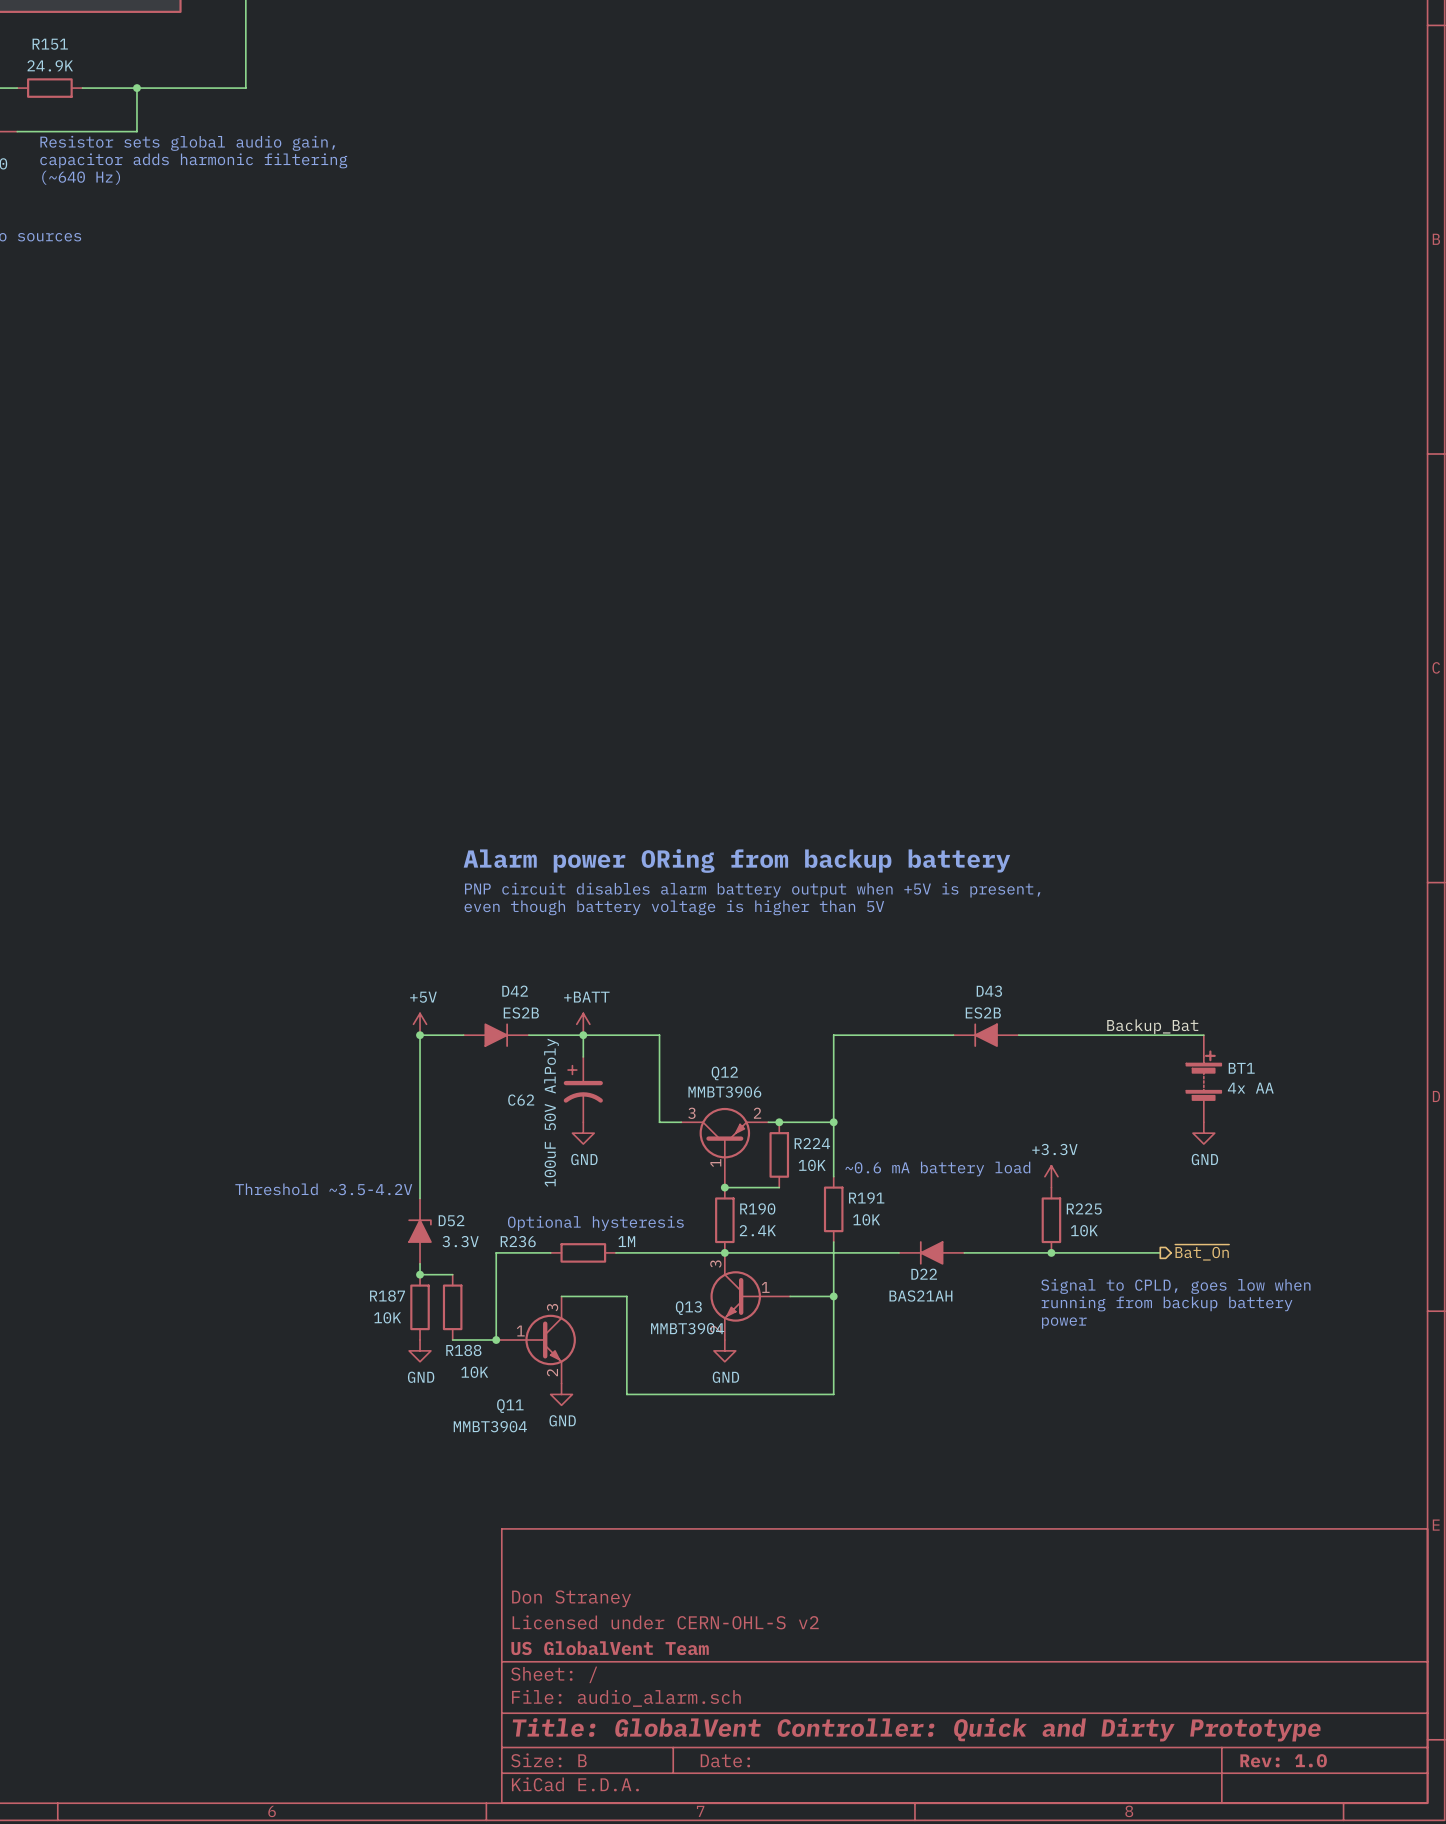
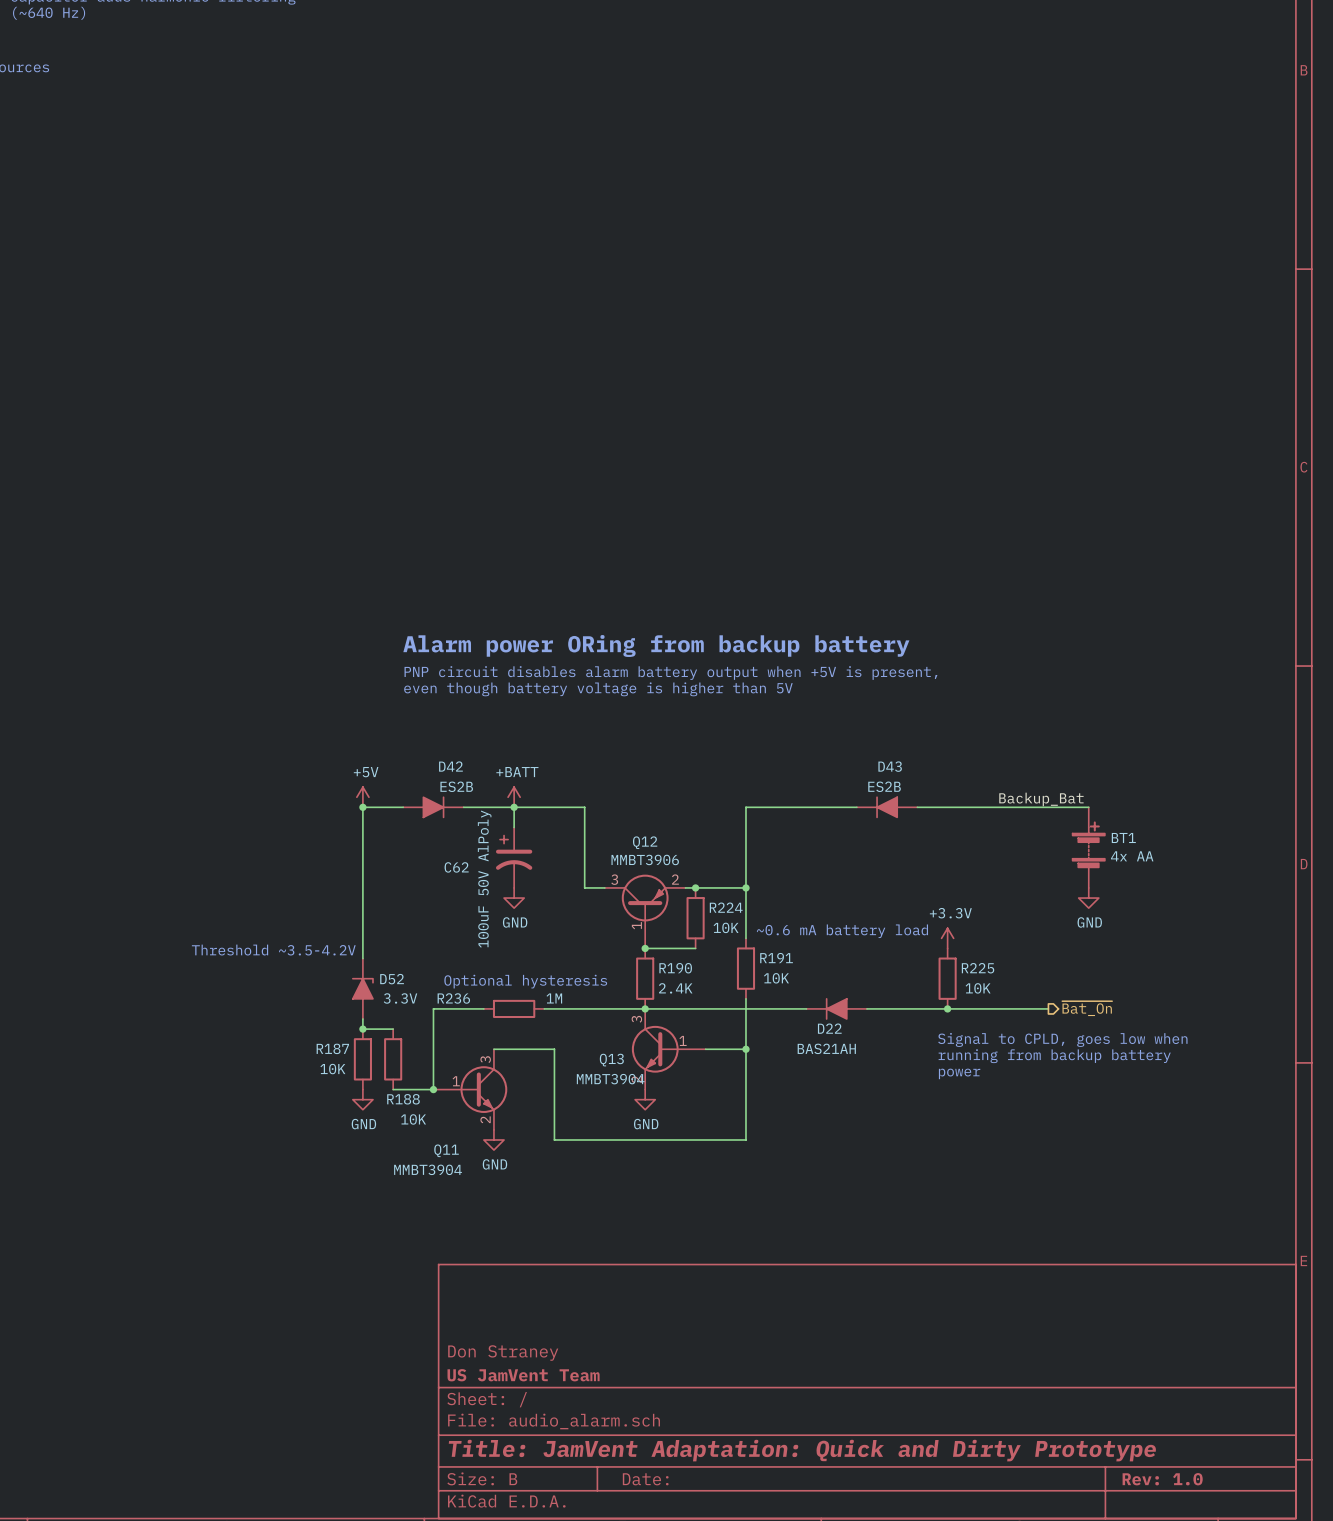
title block: Don Straney (571, 1598) -> none
title block: Licensed under CERN-OHL-S v2 (665, 1622) -> Don Straney (503, 1353)
title block: US GlobalVent Team (610, 1648) -> US JamVent Team (523, 1375)
title block: Title: GlobalVent Controller: Quick and Dirty Prototype (916, 1729) -> Title: JamVent Adaptation: Quick and Dirty Prototype (802, 1450)

